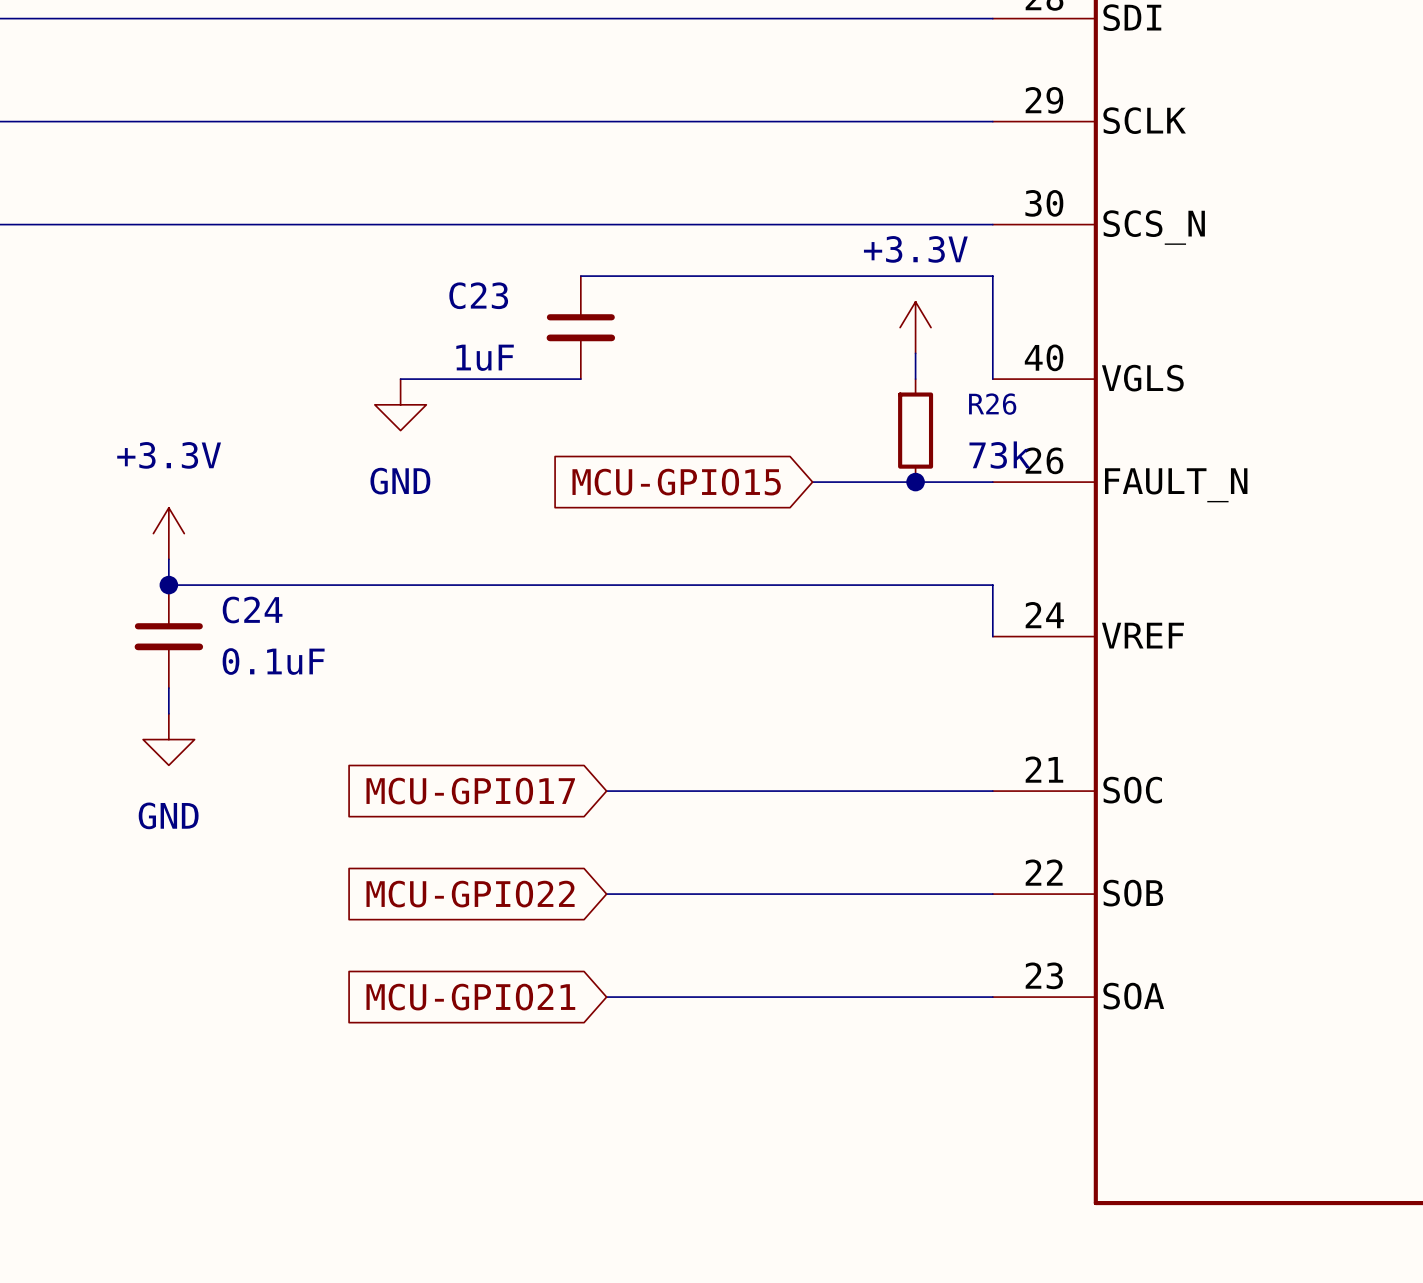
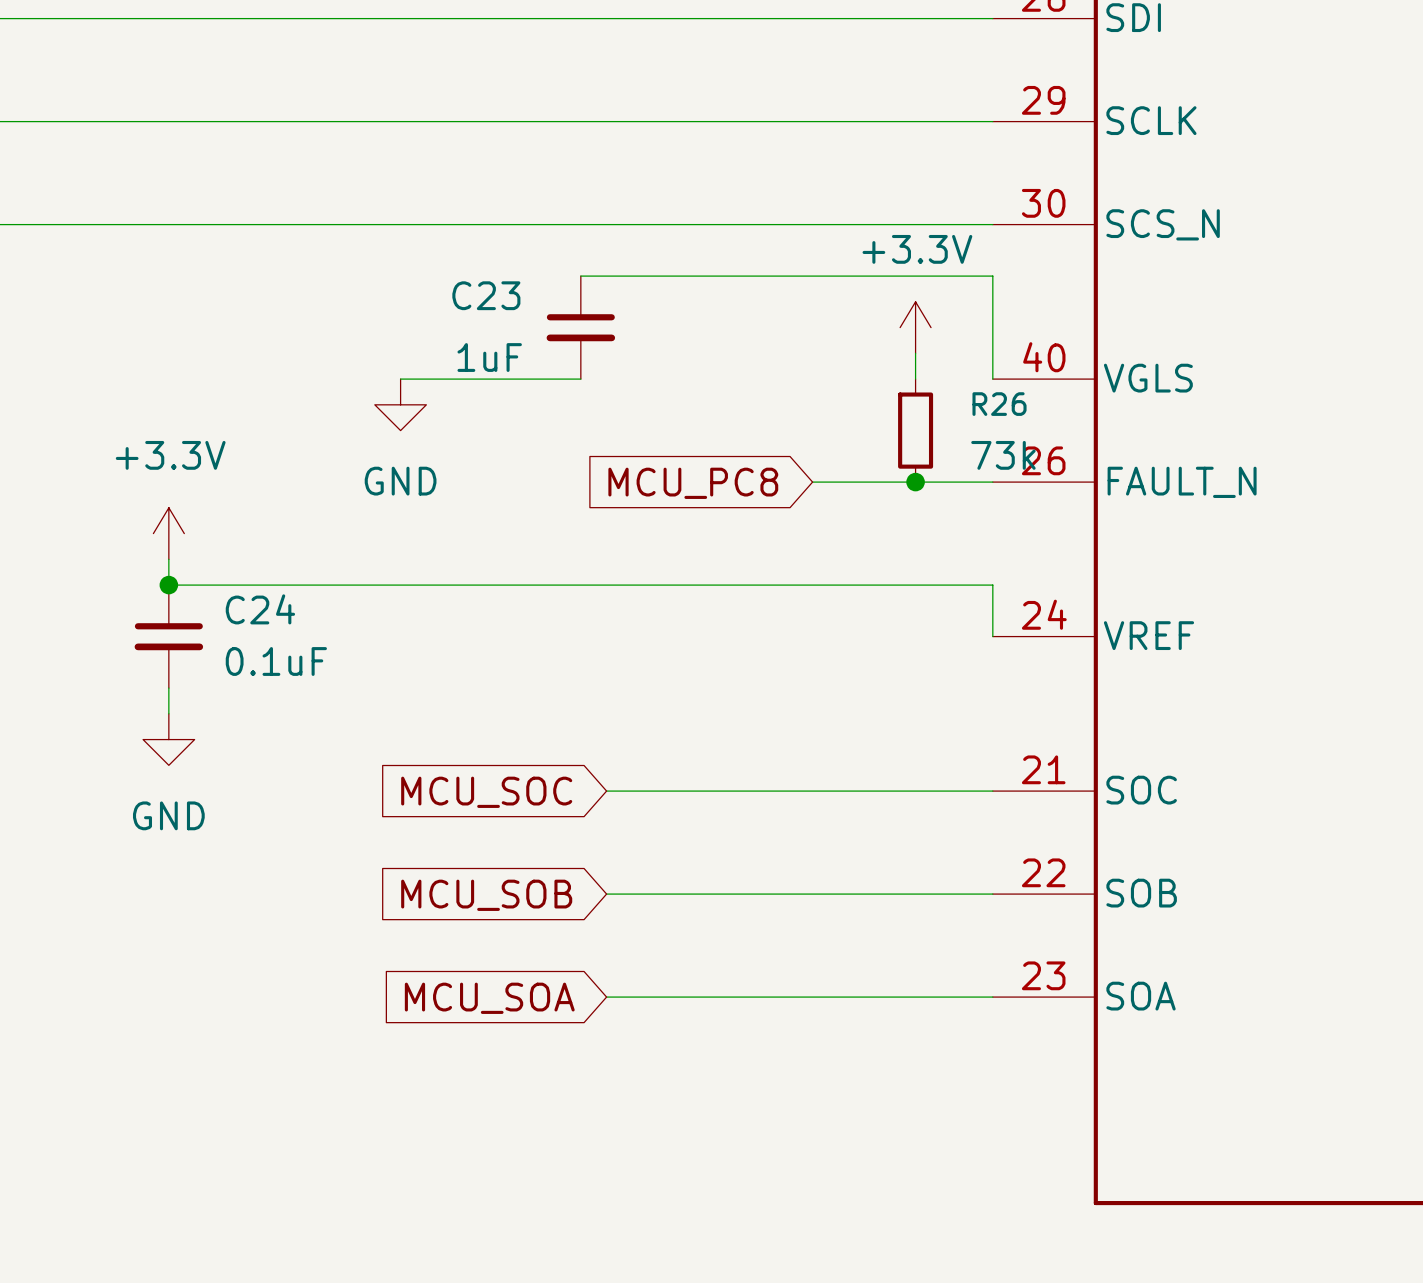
global label: MCU-GPIO15 (676, 482) -> MCU_PC8 (693, 483)
global label: MCU-GPIO17 (470, 791) -> MCU_SOC (486, 792)
global label: MCU-GPIO22 (470, 894) -> MCU_SOB (486, 895)
global label: MCU-GPIO21 (470, 997) -> MCU_SOA (489, 998)

